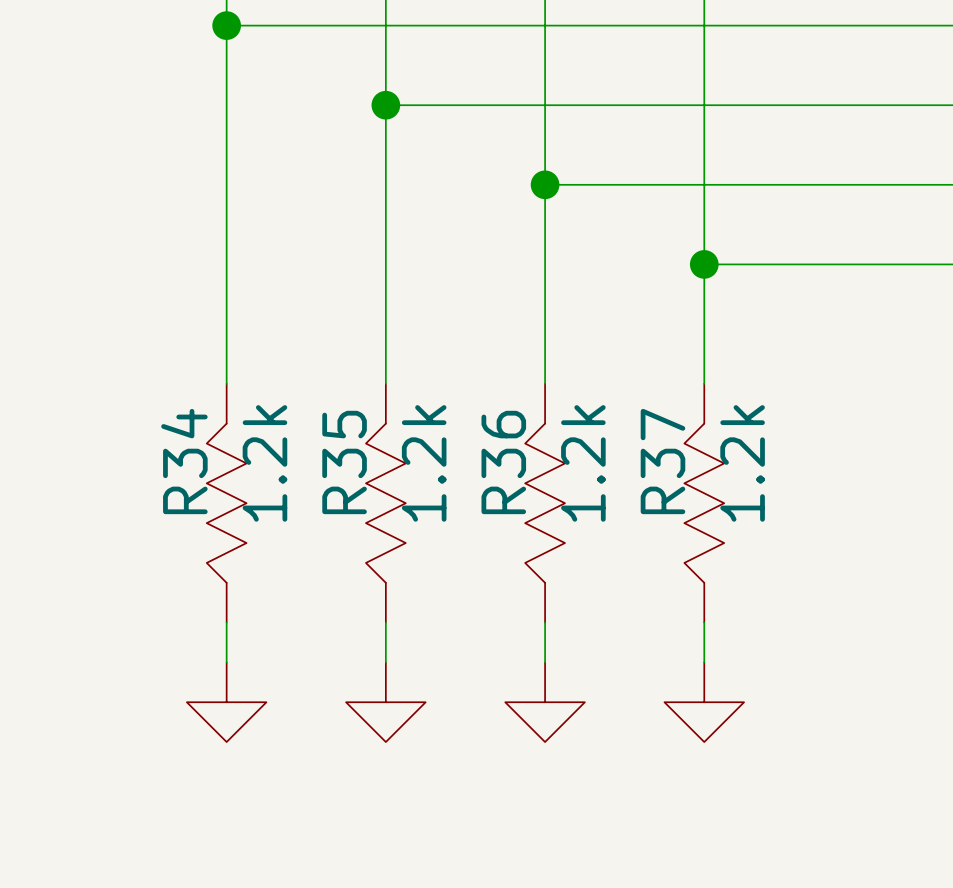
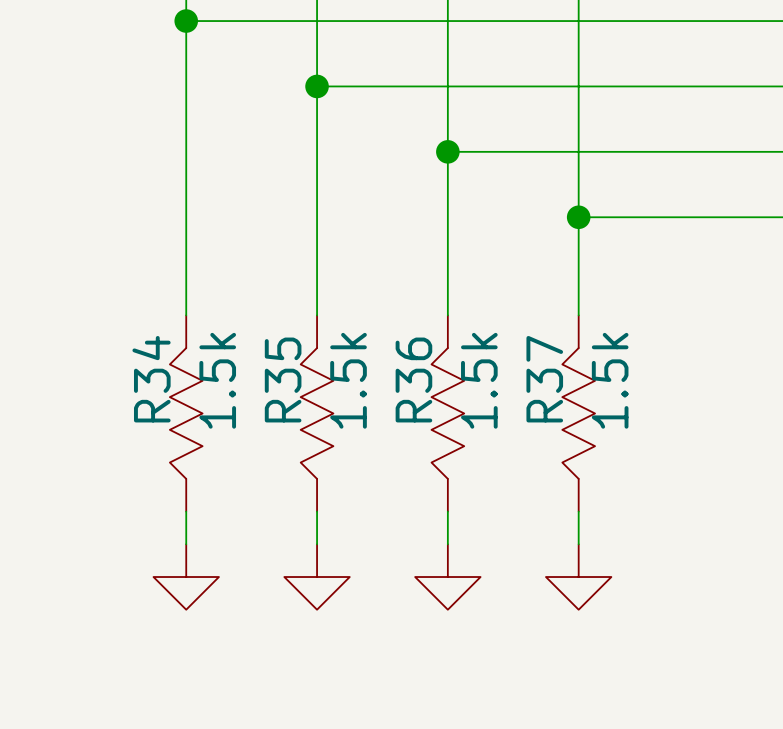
R34 value: 1.2k (264, 463) -> 1.5k (217, 380)
R35 value: 1.2k (424, 463) -> 1.5k (348, 380)
R36 value: 1.2k (583, 463) -> 1.5k (479, 380)
R37 value: 1.2k (742, 463) -> 1.5k (610, 380)

